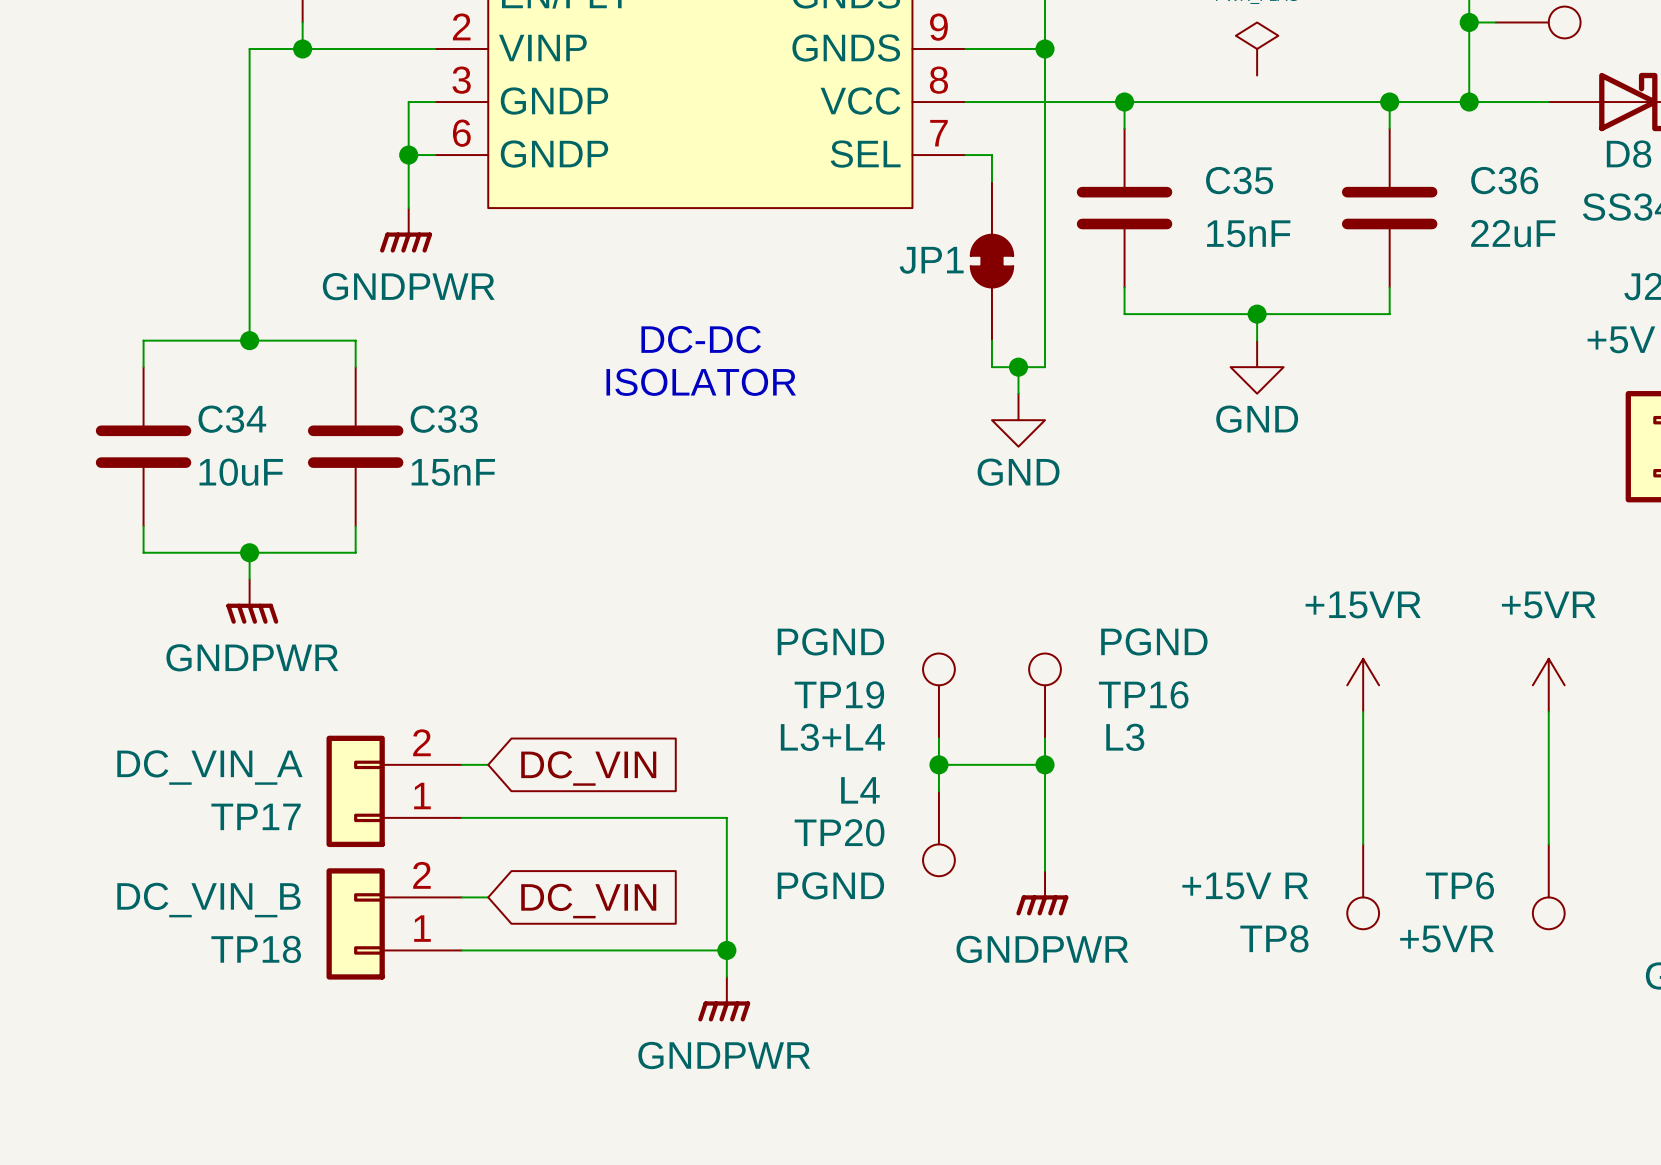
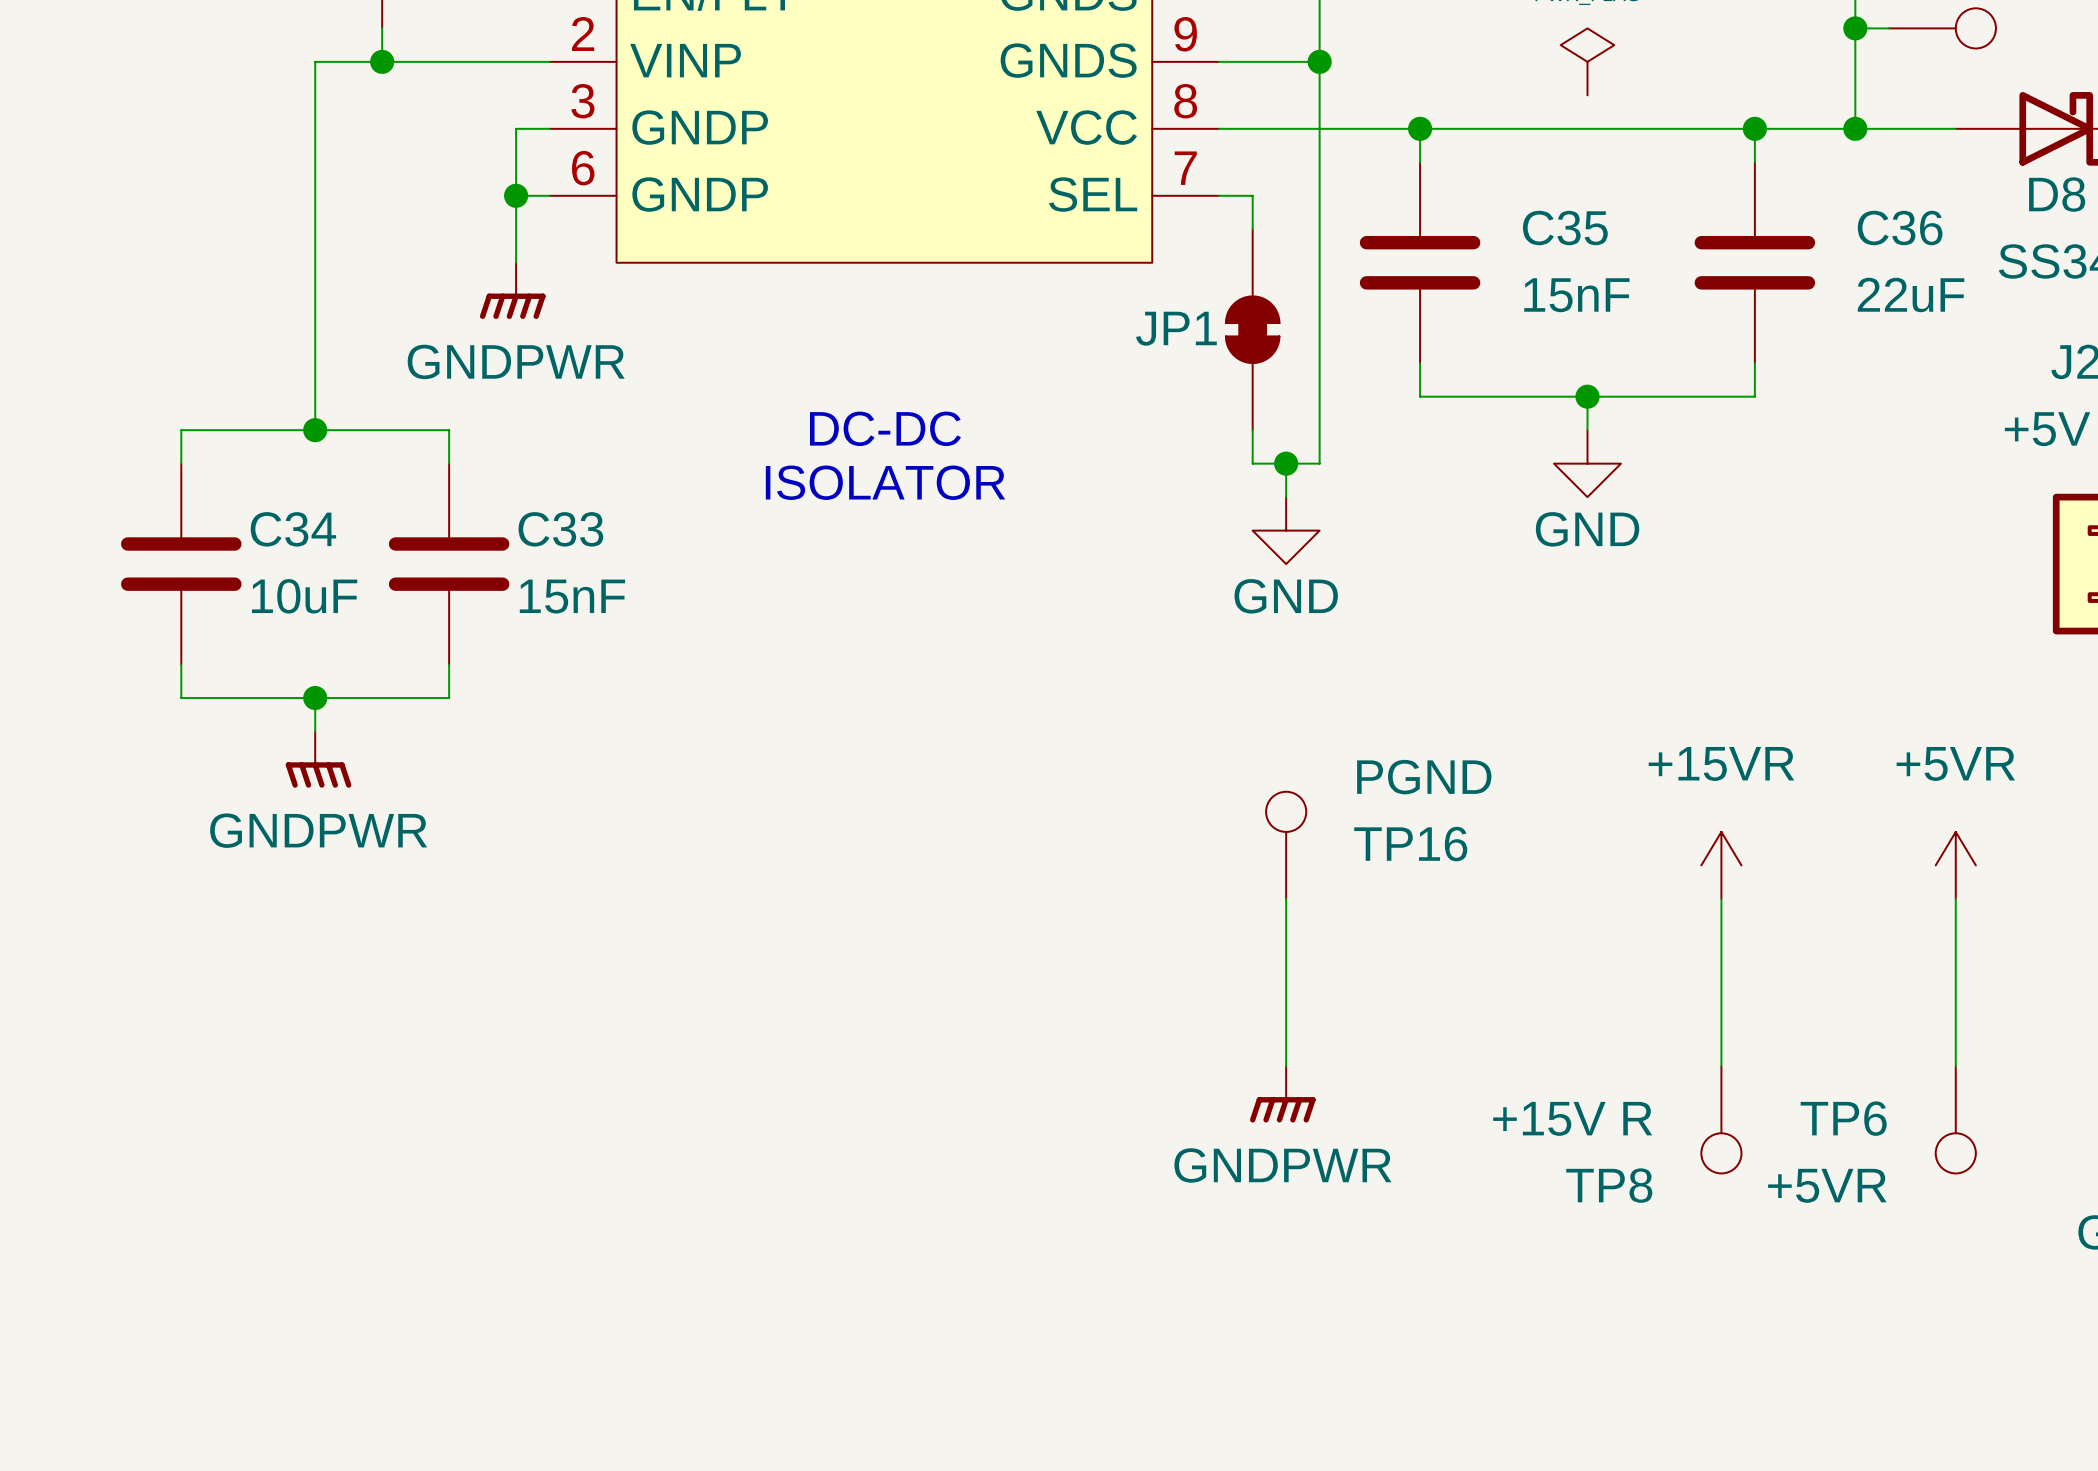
TP19: PGND (938, 695) -> none
TP16 position: (1045, 695) -> (1286, 845)
TP16 text: L3 (1125, 737) -> none
wire: (938, 738) (938, 791) -> none
wire: (1045, 738) (1045, 870) -> (1286, 898) (1286, 1066)
wire: (461, 764) (488, 764) -> none
wire: (938, 764) (1045, 764) -> none
junction: (938, 764) -> none
junction: (1045, 764) -> none
global label: DC_VIN (588, 768) -> none
TP17: DC_VIN_A (394, 791) -> none
wire: (461, 817) (726, 817) (726, 976) -> none
TP20: PGND (938, 833) -> none
power symbol position: GNDPWR (1042, 893) -> GNDPWR (1282, 1094)
wire: (461, 897) (488, 897) -> none
global label: DC_VIN (588, 901) -> none
TP18: DC_VIN_B (394, 923) -> none
wire: (461, 950) (726, 950) -> none
junction: (726, 950) -> none
power symbol: GNDPWR (724, 999) -> none

